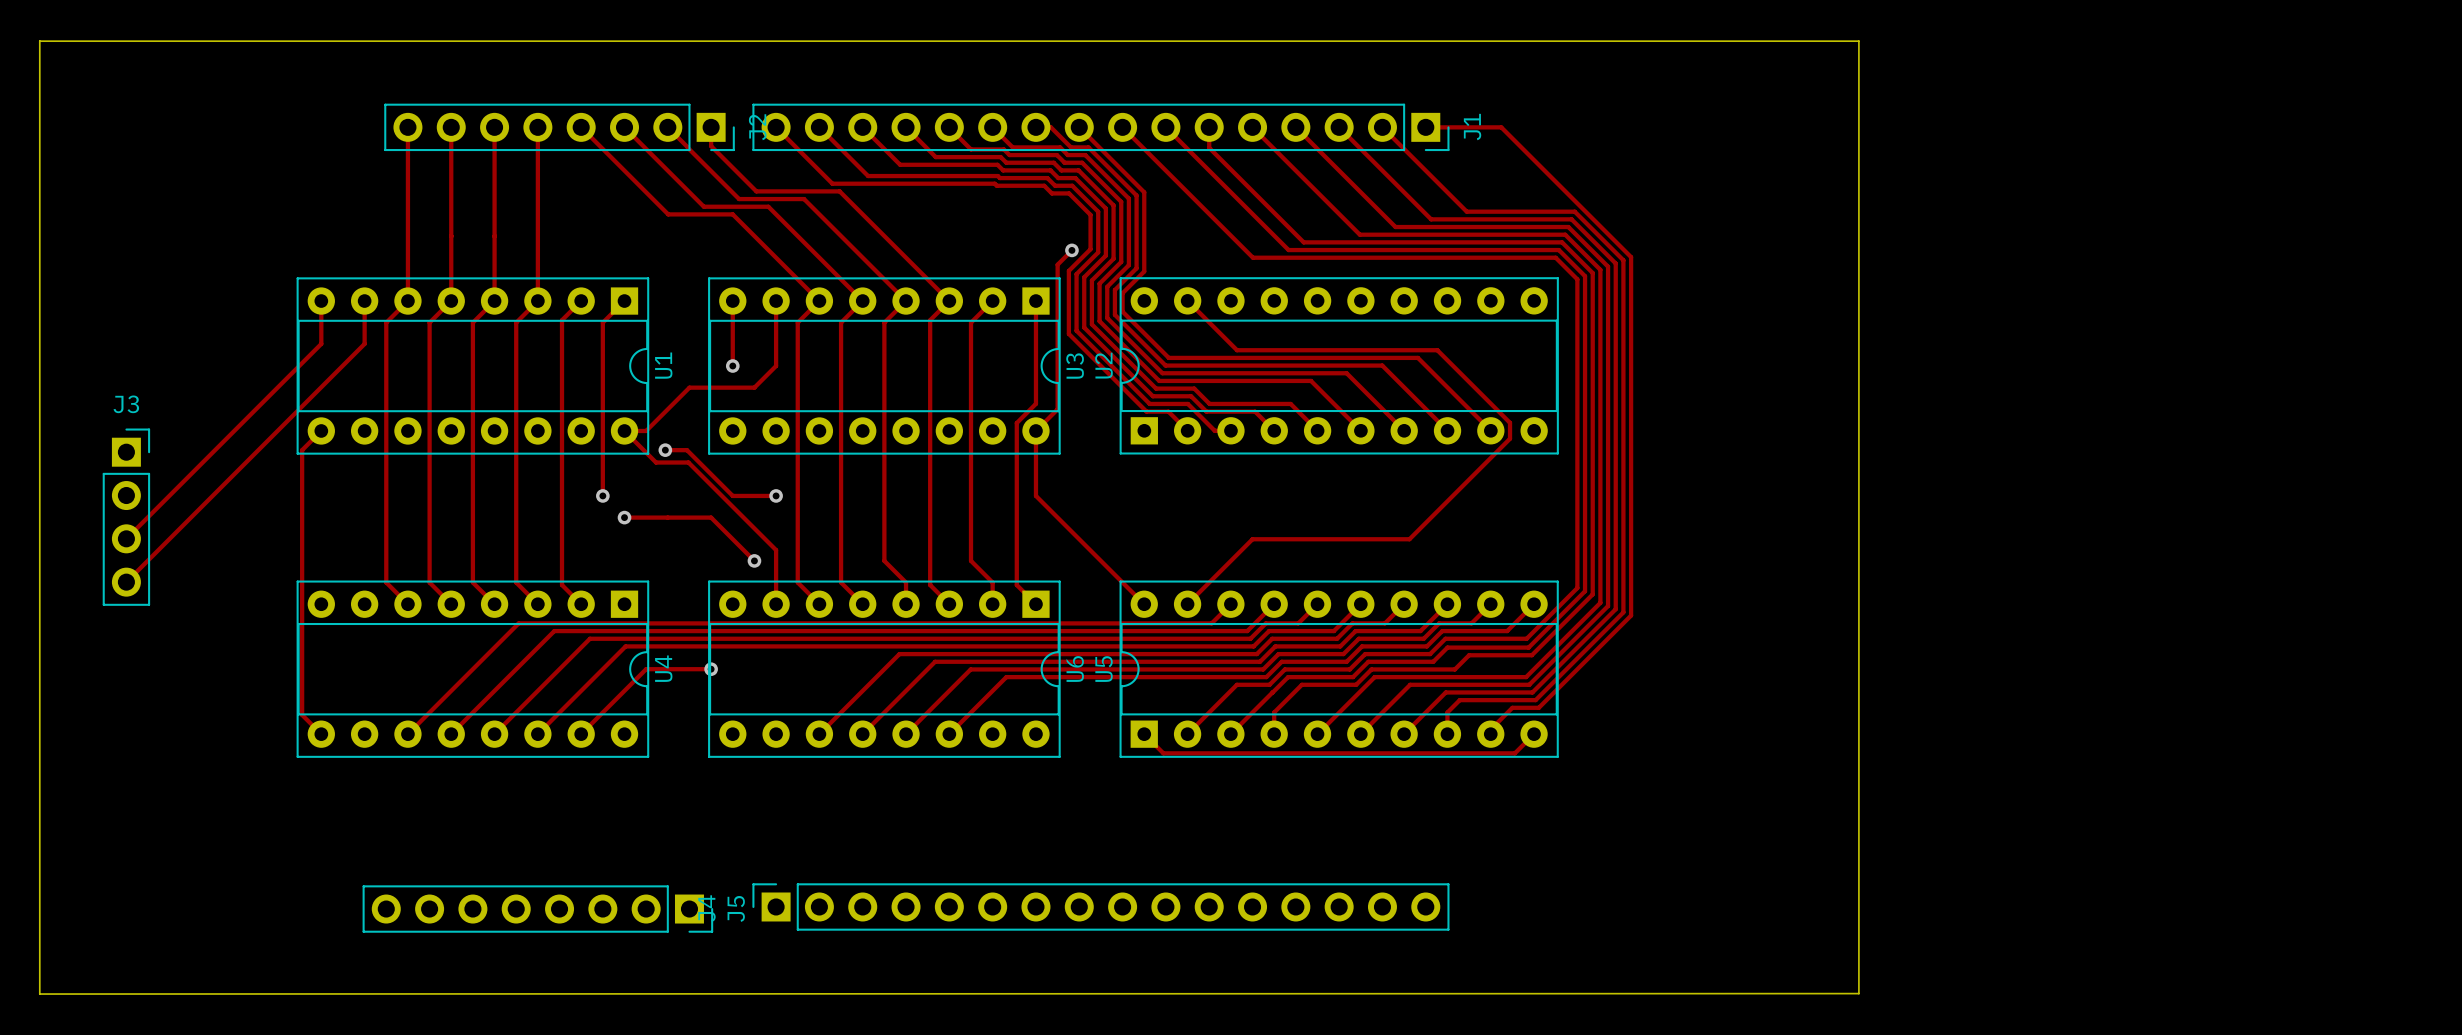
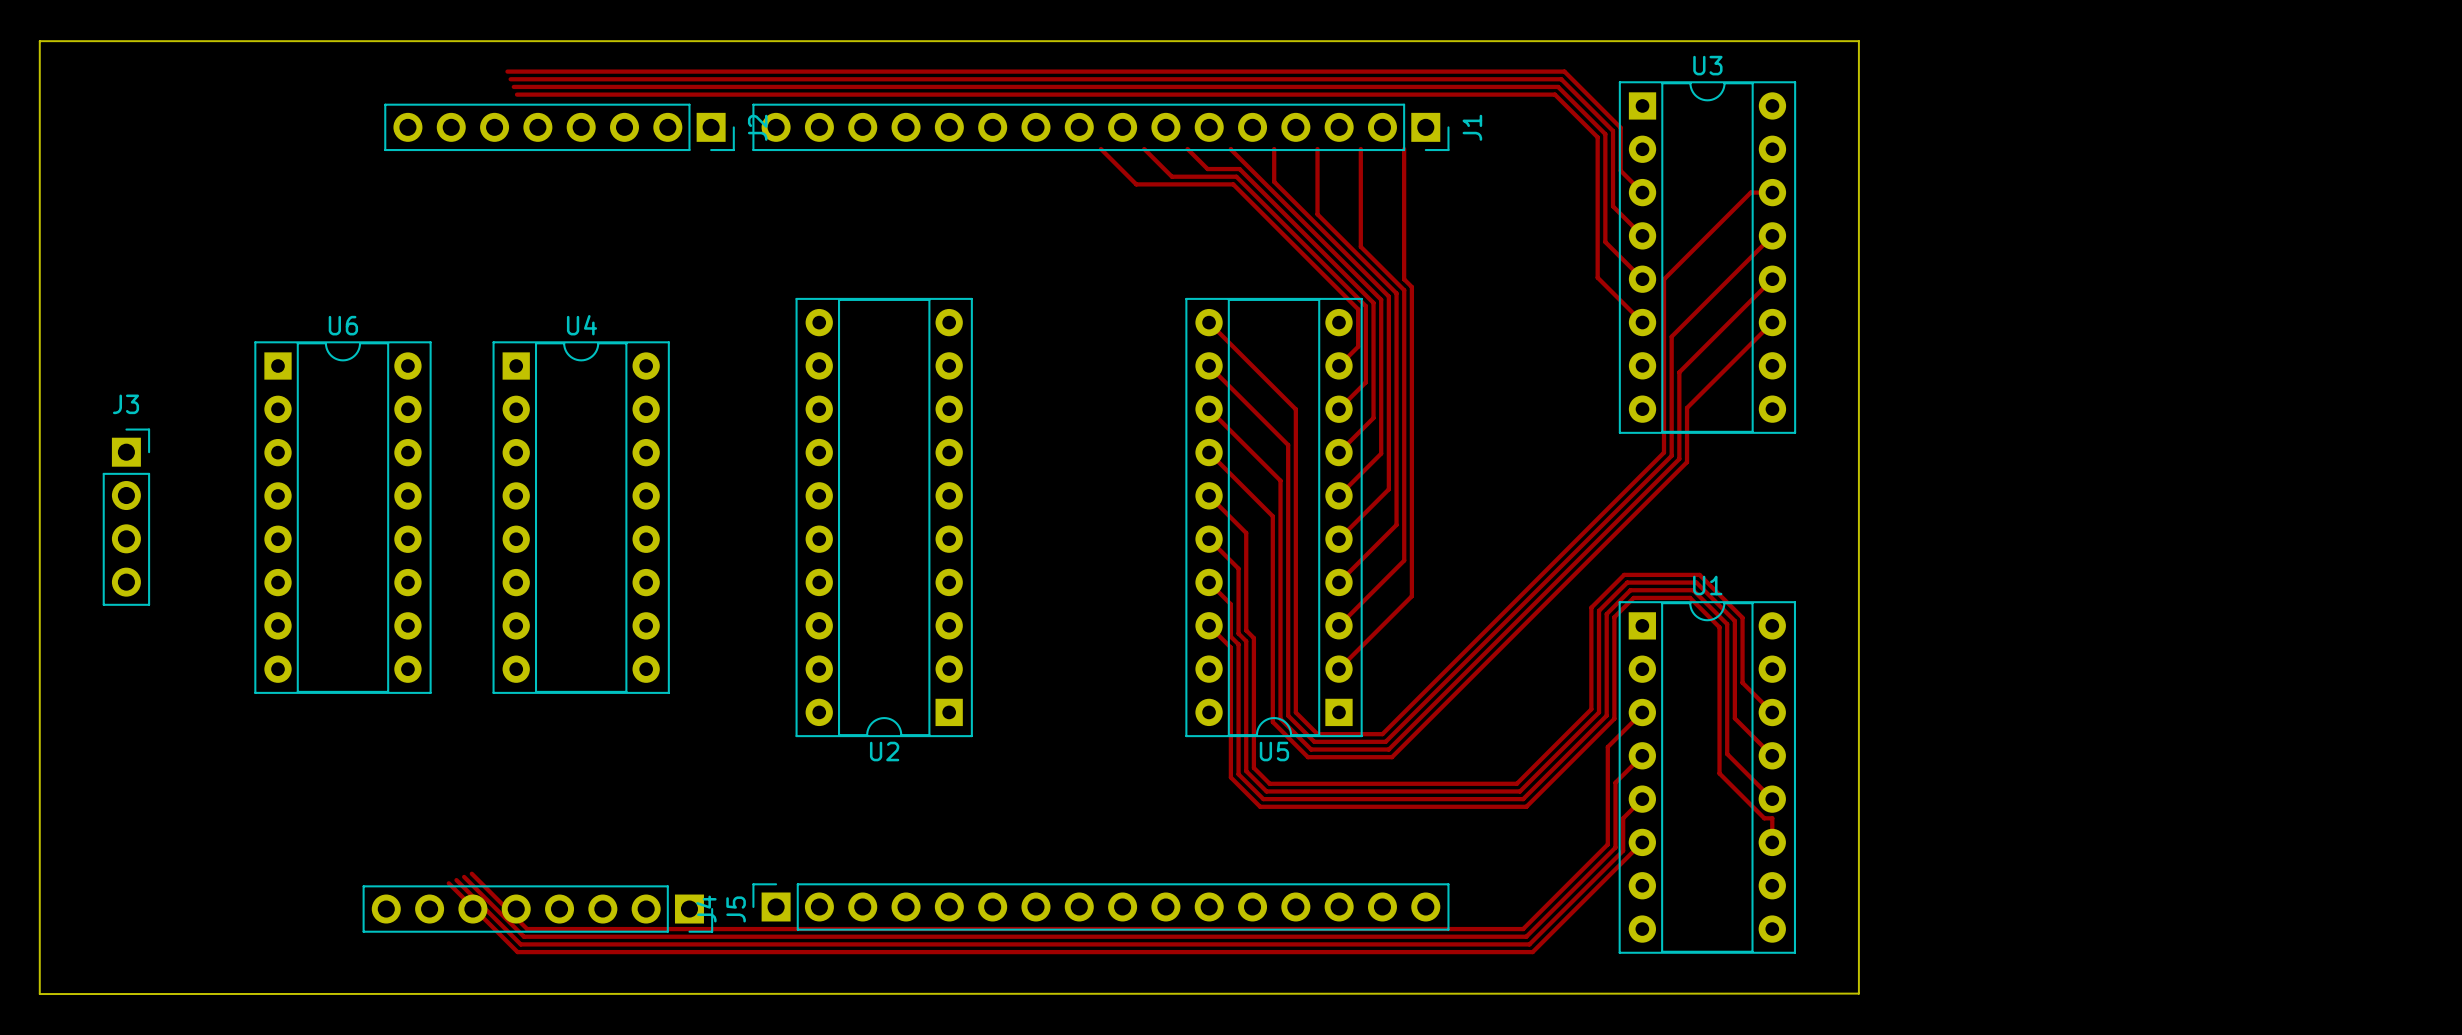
track: none -> (507, 71) (1564, 71) (1620, 127) (1620, 170) (1642, 192)
track: none -> (510, 79) (1561, 79) (1613, 130) (1613, 206) (1642, 235)
track: none -> (513, 86) (1558, 86) (1605, 134) (1605, 242) (1642, 279)
track: none -> (516, 94) (1554, 94) (1597, 137) (1597, 277) (1642, 322)
track: (407, 127) (407, 301) (386, 322) (386, 582) (407, 604) -> none
track: (451, 127) (451, 236) -> none
track: (494, 127) (494, 236) -> none
track: (537, 127) (537, 301) (516, 322) (516, 582) (537, 604) -> none
track: (581, 127) (668, 214) (732, 214) (819, 301) (797, 322) (797, 582) (819, 604) -> none
track: (624, 127) (703, 206) (768, 206) (862, 301) (841, 322) (841, 582) (862, 604) -> none
track: (667, 127) (739, 199) (804, 199) (906, 301) (884, 322) (884, 560) (906, 582) (906, 604) -> none
track: (711, 127) (711, 146) (756, 191) (839, 191) (949, 301) (930, 320) (930, 585) (949, 604) -> none
track: (776, 127) (832, 183) (994, 183) (996, 185) (1044, 185) (1051, 193) (1069, 193) (1090, 214) (1090, 249) (1068, 270) (1068, 333) (1146, 411) (1168, 411) (1187, 430) -> none
track: (819, 127) (868, 176) (1047, 178) (1055, 185) (1072, 185) (1098, 211) (1098, 252) (1076, 274) (1076, 330) (1149, 403) (1187, 403) (1214, 430) (1230, 430) -> none
track: (862, 127) (900, 164) (997, 164) (1003, 170) (1050, 170) (1058, 178) (1075, 178) (1105, 208) (1105, 255) (1084, 277) (1084, 327) (1152, 396) (1191, 396) (1206, 411) (1255, 411) (1274, 430) -> none
track: (906, 127) (935, 157) (1000, 157) (1006, 162) (1053, 162) (1061, 170) (1078, 170) (1113, 205) (1113, 258) (1091, 280) (1091, 324) (1156, 388) (1194, 388) (1209, 403) (1290, 403) (1317, 430) -> none
track: (949, 127) (971, 149) (1003, 149) (1009, 155) (1056, 155) (1064, 162) (1082, 162) (1121, 201) (1121, 261) (1099, 283) (1099, 321) (1159, 380) (1311, 380) (1360, 430) -> none
track: (992, 127) (1012, 147) (1060, 147) (1067, 155) (1085, 155) (1128, 198) (1128, 265) (1107, 286) (1107, 318) (1162, 373) (1346, 373) (1404, 430) -> none
track: (1035, 127) (1050, 127) (1070, 147) (1088, 147) (1136, 195) (1136, 268) (1114, 290) (1114, 314) (1165, 365) (1382, 365) (1447, 430) -> none
track: (1079, 127) (1100, 149) -> none
track: (1122, 127) (1144, 149) -> none
track: (1165, 127) (1187, 149) -> none
track: (1209, 127) (1209, 147) (1303, 242) (1562, 242) (1592, 273) (1592, 594) (1531, 655) (1469, 655) (1454, 669) (1371, 669) (1356, 684) (1301, 684) (1274, 712) (1274, 734) -> none
track: (1252, 127) (1359, 234) (1565, 234) (1600, 269) (1600, 602) (1526, 677) (1374, 677) (1317, 734) -> (1209, 322) (1295, 409) (1295, 712) (1317, 734)
track: (1295, 127) (1395, 227) (1568, 227) (1608, 266) (1608, 606) (1529, 684) (1410, 684) (1360, 734) -> none
track: (1339, 127) (1431, 219) (1571, 219) (1615, 263) (1615, 609) (1532, 692) (1445, 692) -> none
track: (1382, 127) (1466, 211) (1574, 211) (1623, 260) (1623, 612) (1535, 700) (1459, 700) (1447, 712) (1447, 734) -> none
track: (1425, 127) (1501, 127) (1631, 257) (1631, 615) (1538, 707) (1512, 707) (1490, 729) (1490, 734) -> none
track: none -> (1230, 149) (1381, 299) (1381, 453) (1338, 495)
track: none -> (1274, 149) (1274, 181) (1388, 296) (1388, 489) (1338, 539)
track: none -> (1317, 149) (1317, 214) (1396, 293) (1396, 524) (1338, 582)
track: none -> (1360, 149) (1360, 246) (1404, 290) (1404, 560) (1338, 625)
track: none -> (1404, 149) (1404, 279) (1411, 287) (1411, 596) (1338, 669)
track: (1207, 169) (1288, 250) (1558, 250) (1585, 276) (1585, 591) (1528, 647) (1447, 647) (1433, 661) (1368, 661) (1353, 677) (1288, 677) (1272, 692) -> (1207, 169) (1239, 169) (1373, 302) (1373, 418) (1338, 452)
track: (1171, 176) (1252, 257) (1555, 257) (1577, 279) (1577, 588) (1526, 638) (1445, 638) (1430, 654) (1365, 654) (1349, 669) (1284, 669) (1269, 684) (1236, 684) (1187, 734) -> (1171, 176) (1236, 176) (1365, 306) (1365, 382) (1338, 409)
track: (1136, 184) (1144, 192) (1144, 271) (1122, 293) (1122, 311) (1168, 357) (1417, 357) (1490, 430) -> (1136, 184) (1233, 184) (1358, 309) (1358, 346) (1338, 365)
track: none -> (1772, 192) (1750, 192) (1664, 279) (1664, 452) (1382, 734) (1317, 734)
track: none -> (1772, 235) (1671, 336) (1671, 455) (1385, 741) (1314, 741) (1288, 715) (1288, 445) (1209, 365)
track: (451, 236) (451, 301) (429, 322) (429, 582) (451, 604) -> none
track: (494, 236) (494, 301) (472, 322) (472, 582) (494, 604) -> none
track: (1071, 250) (1057, 264) (1057, 409) (1035, 430) (1035, 495) (1144, 604) -> none
via: (1071, 250) -> none
track: none -> (1772, 279) (1679, 372) (1679, 458) (1534, 604)
track: (1187, 300) (1237, 350) (1437, 350) (1510, 422) (1510, 438) (1409, 539) (1252, 539) (1187, 604) -> none
track: (321, 301) (321, 343) (126, 538) -> none
track: (364, 301) (364, 343) (126, 582) -> none
track: (581, 301) (562, 320) (562, 585) (581, 604) -> none
track: (624, 301) (602, 322) (602, 495) -> none
track: (732, 301) (732, 366) -> none
track: (776, 301) (776, 366) (754, 387) (689, 387) (646, 430) (624, 430) (656, 462) (688, 462) (776, 550) (776, 604) -> none
track: (992, 301) (971, 322) (971, 560) (992, 582) (992, 604) -> none
track: (1035, 301) (1035, 403) (1016, 423) (1016, 585) (1035, 604) -> none
track: none -> (1772, 322) (1687, 407) (1687, 462) (1392, 757) (1307, 757) (1272, 722) (1272, 516) (1209, 452)
U2 rotation: 0° (1339, 365) -> 90° counterclockwise (884, 517)
U2 position: (1339, 365) -> (884, 517)
U1 rotation: 0° (472, 366) -> 90° counterclockwise (1707, 777)
U1 position: (472, 366) -> (1707, 777)
via: (732, 366) -> none
U3 rotation: 0° (884, 366) -> 90° counterclockwise (1707, 257)
U3 position: (884, 366) -> (1707, 257)
track: none -> (1209, 409) (1280, 480) (1280, 718) (1311, 749) (1388, 749) (1404, 734)
track: (321, 430) (302, 450) (302, 714) (321, 734) -> none
track: (665, 450) (687, 450) (732, 495) (776, 495) -> none
via: (665, 450) -> none
via: (602, 495) -> none
via: (776, 495) -> none
track: none -> (1209, 495) (1246, 533) (1246, 630) (1253, 638) (1253, 767) (1269, 783) (1516, 783) (1591, 709) (1591, 607) (1624, 574) (1699, 574) (1742, 617) (1742, 682) (1772, 712)
track: (624, 517) (711, 517) (754, 560) -> none
via: (624, 517) -> none
track: none -> (1209, 539) (1238, 568) (1238, 633) (1246, 641) (1246, 771) (1266, 791) (1520, 791) (1599, 712) (1599, 610) (1627, 582) (1696, 582) (1734, 620) (1734, 718) (1772, 755)
via: (754, 560) -> none
track: none -> (1209, 582) (1230, 604) (1230, 636) (1238, 644) (1238, 774) (1263, 799) (1523, 799) (1606, 715) (1606, 614) (1630, 590) (1693, 590) (1727, 624) (1727, 754) (1772, 799)
track: (1230, 604) (1211, 623) (518, 623) (407, 734) -> none
track: (1274, 604) (1247, 631) (554, 631) (451, 734) -> none
track: (1317, 604) (1298, 623) (1265, 623) (1250, 638) (589, 638) (494, 734) -> none
track: (1360, 604) (1333, 631) (1269, 631) (1253, 646) (625, 646) (537, 734) -> none
track: (1404, 604) (1384, 623) (1352, 623) (1337, 638) (1272, 638) (1256, 654) (899, 654) (819, 734) -> none
track: (1447, 604) (1420, 631) (1355, 631) (1340, 646) (1275, 646) (1260, 661) (935, 661) (862, 734) -> none
track: (1490, 604) (1471, 623) (1439, 623) (1423, 638) (1358, 638) (1343, 654) (1278, 654) (1263, 669) (970, 669) (906, 734) -> none
track: none -> (1209, 625) (1230, 647) (1230, 777) (1260, 806) (1526, 806) (1614, 718) (1614, 617) (1633, 597) (1690, 597) (1719, 627) (1719, 773) (1764, 818) (1772, 818) (1772, 842)
track: (1507, 631) (1442, 631) (1426, 646) (1362, 646) (1346, 661) (1281, 661) (1266, 677) (1006, 677) (949, 734) -> (1507, 631) (1445, 692)
U4 rotation: 0° (472, 669) -> 90° counterclockwise (581, 517)
track: (711, 669) (646, 669) (581, 734) -> none
via: (711, 669) -> none
U6 rotation: 0° (884, 669) -> 90° counterclockwise (342, 517)
U6 position: (884, 669) -> (342, 517)
U5 rotation: 0° (1339, 669) -> 90° counterclockwise (1274, 517)
track: (1272, 692) (1230, 734) -> none
track: none -> (1642, 712) (1607, 747) (1607, 844) (1523, 929) (527, 929) (471, 873)
track: (1144, 734) (1163, 753) (1514, 753) (1534, 734) -> none
track: none -> (1642, 755) (1615, 782) (1615, 847) (1526, 936) (523, 936) (464, 876)
track: none -> (1642, 799) (1623, 818) (1623, 850) (1529, 944) (520, 944) (456, 880)
track: none -> (1642, 842) (1532, 952) (517, 952) (448, 883)

